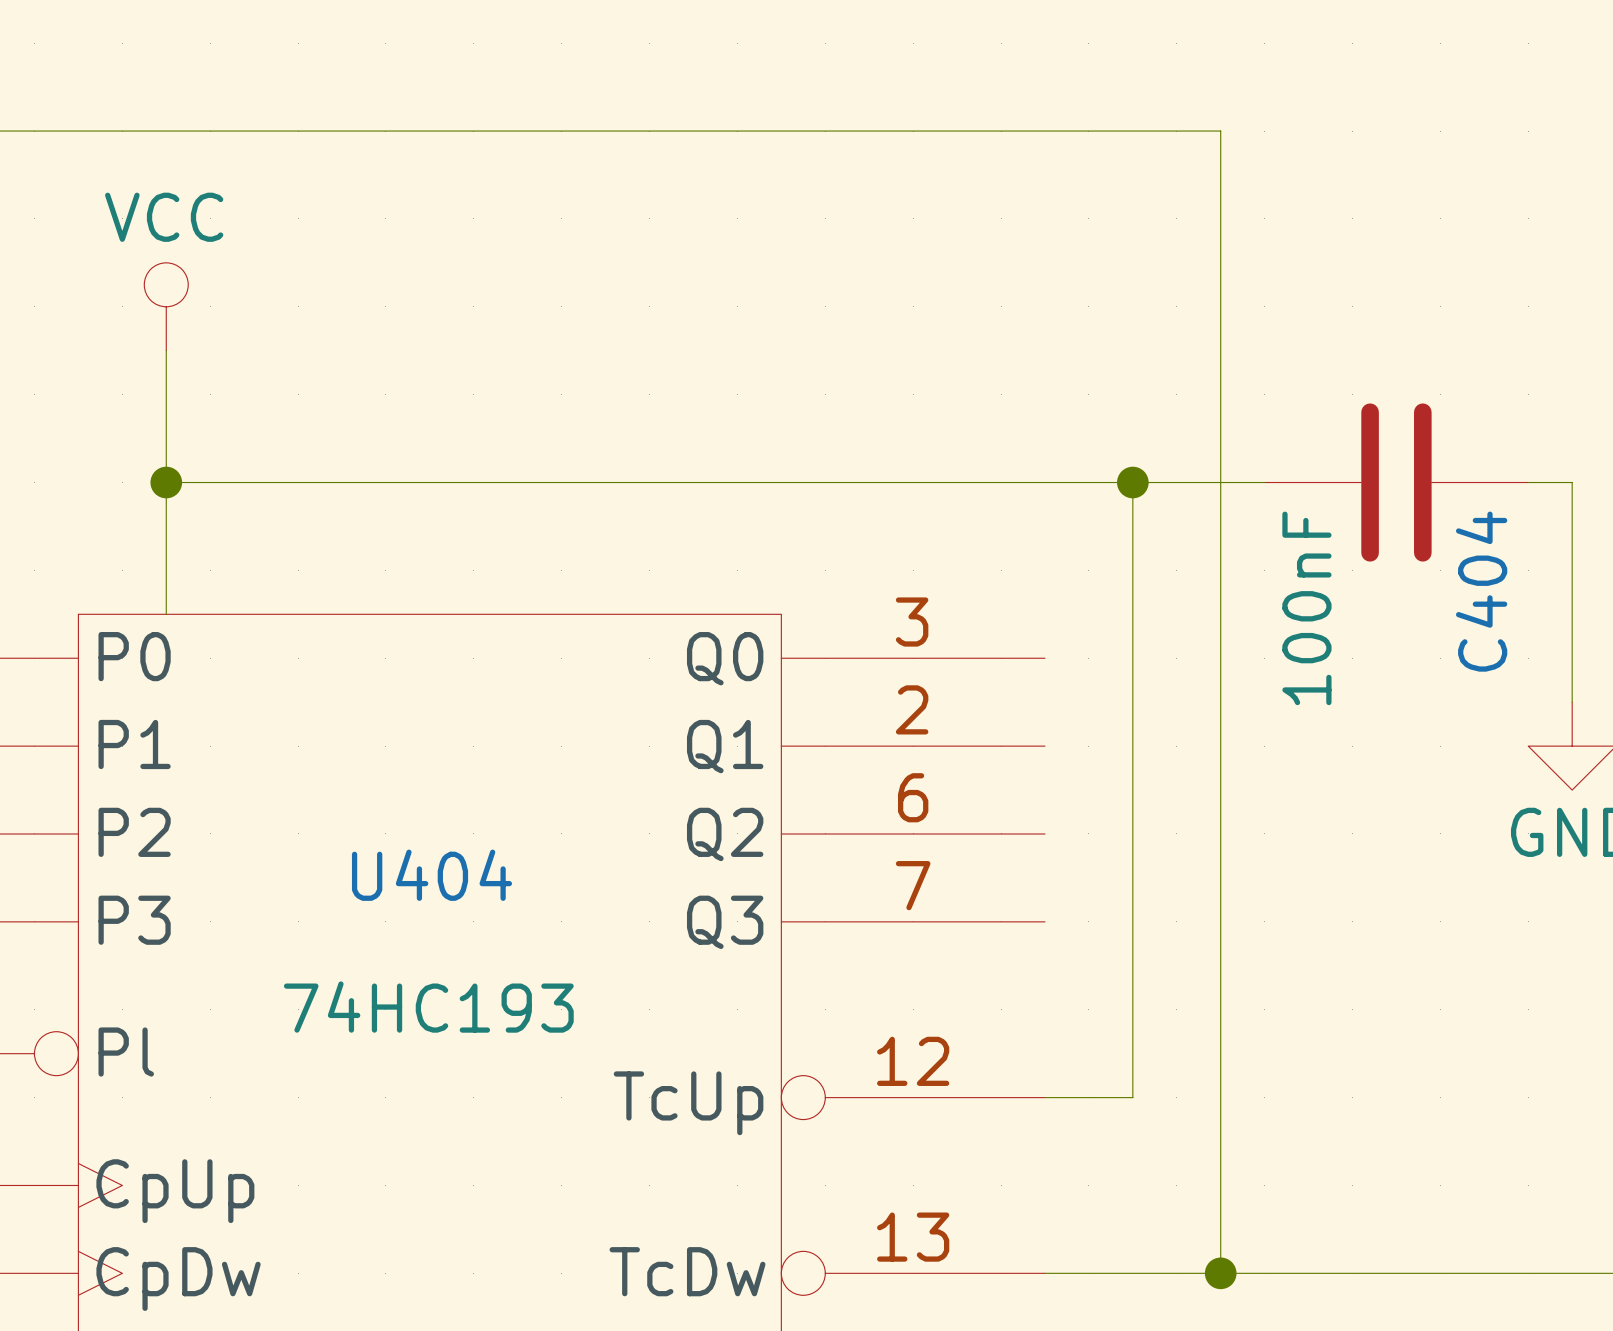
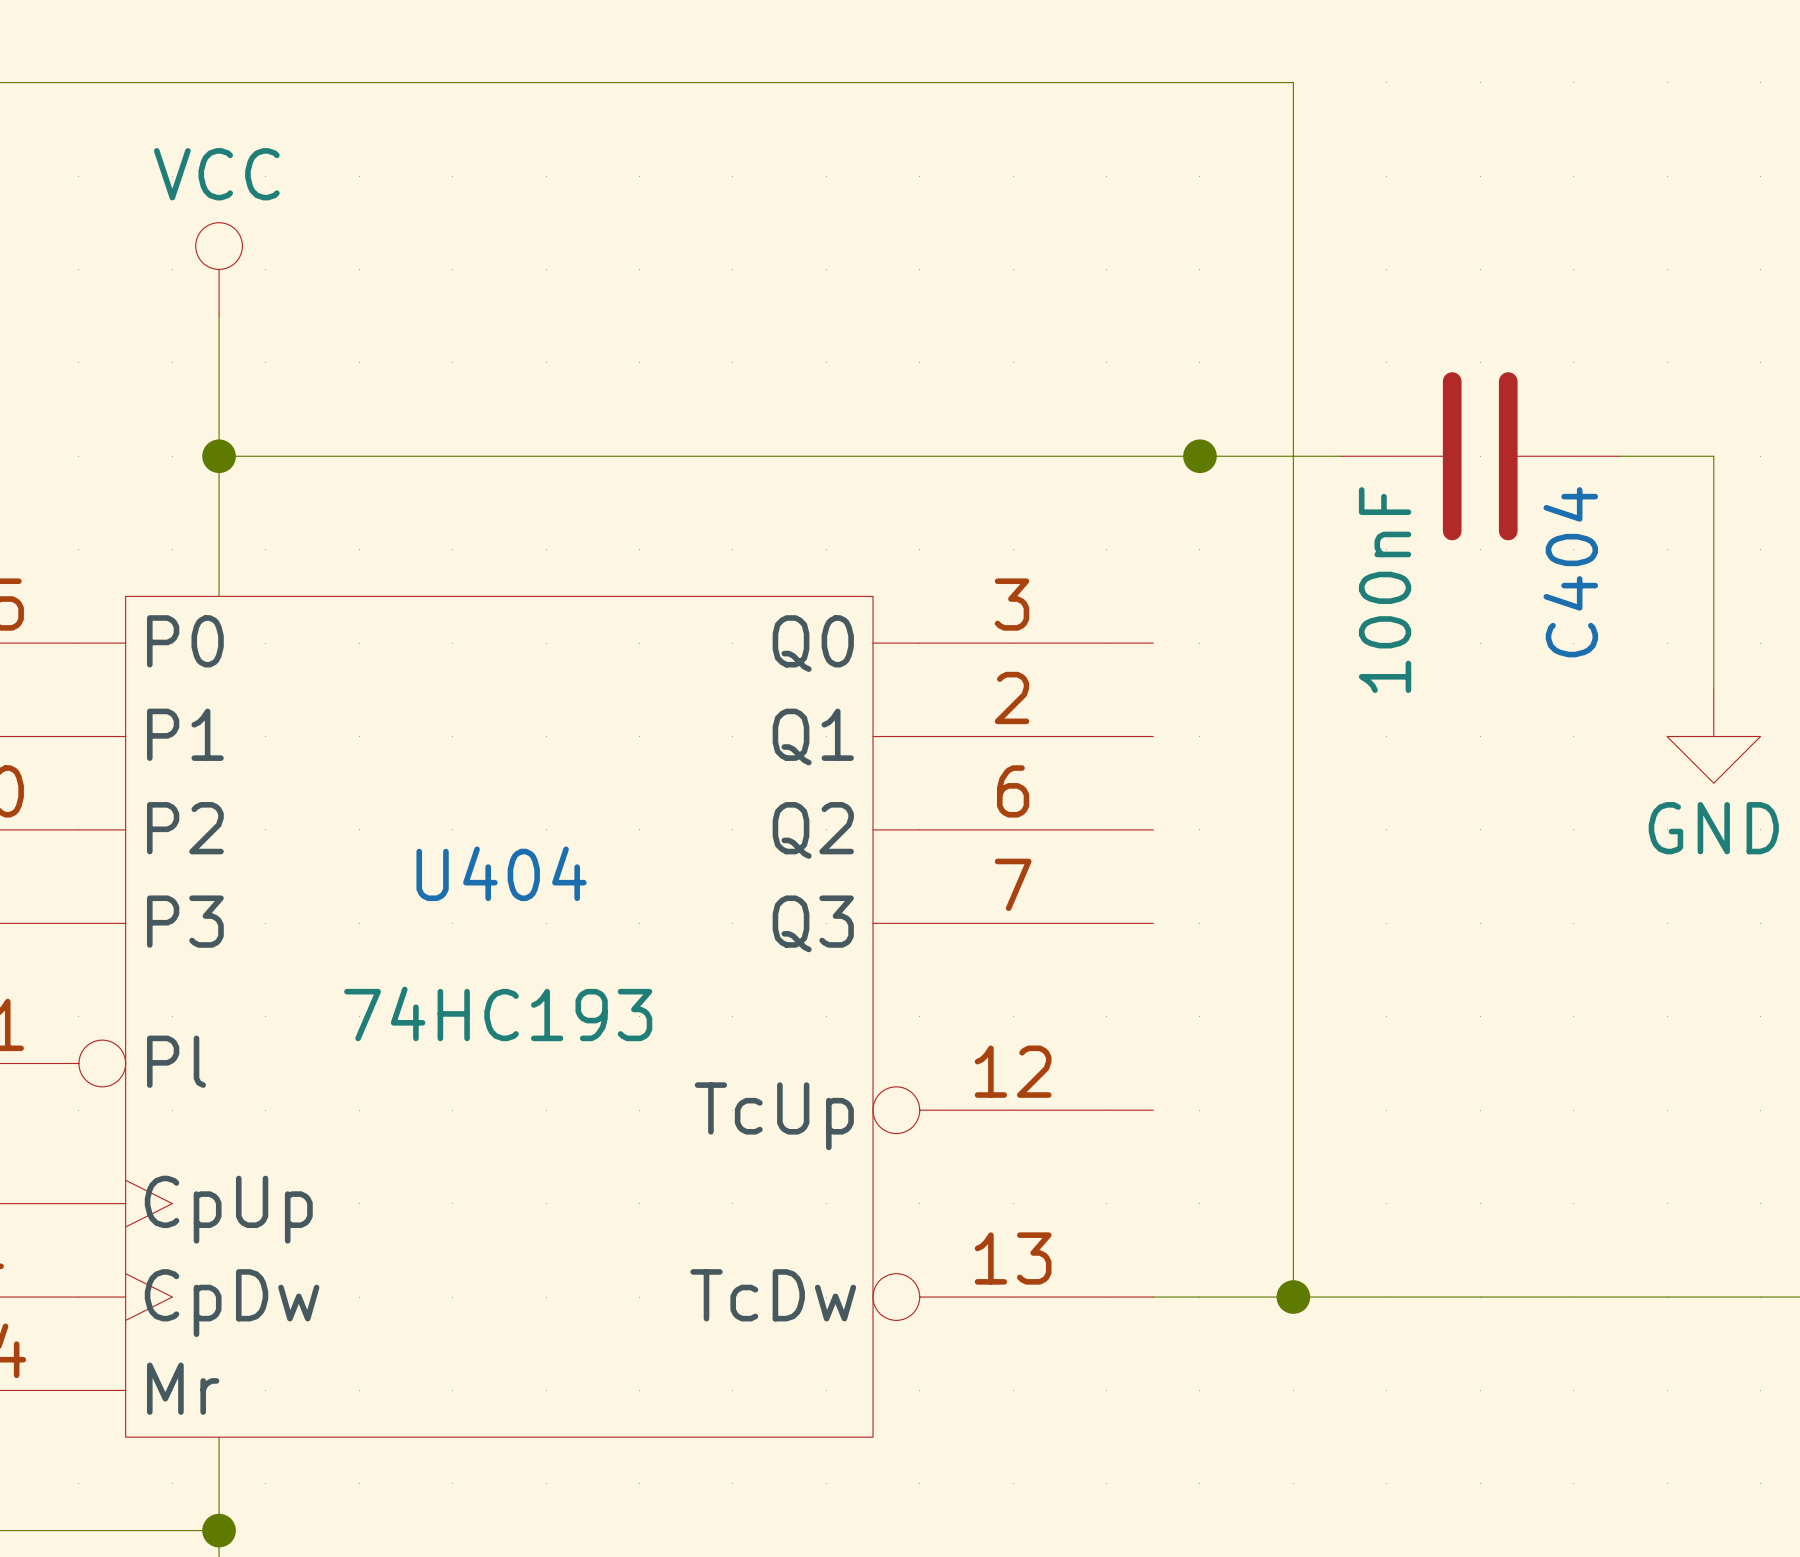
wire: (1176, 131) (1220, 131) (1220, 1273) -> (1293, 82) (1293, 1297)
wire: (1132, 482) (1132, 1097) (1044, 1097) -> none
junction position: (1132, 482) -> (1199, 456)
C404 position: (1396, 482) -> (1480, 456)
junction position: (1220, 1273) -> (1293, 1297)

